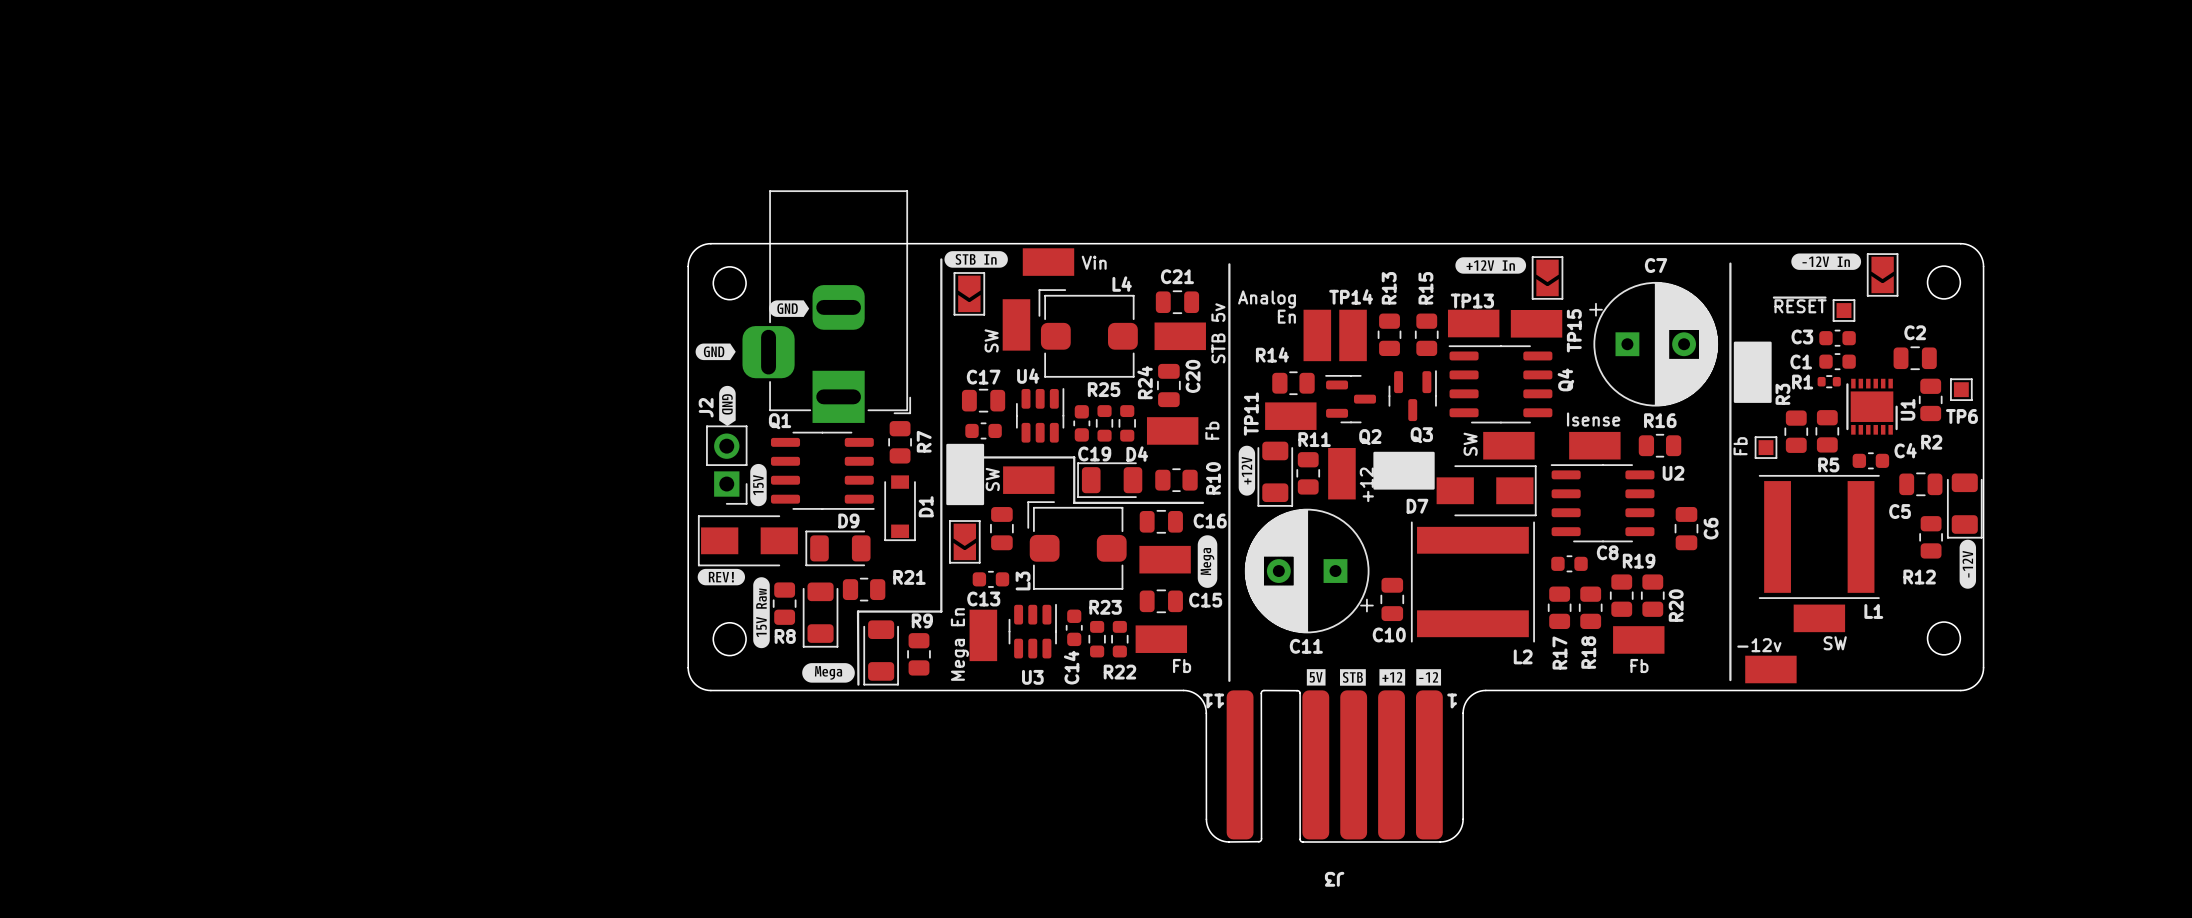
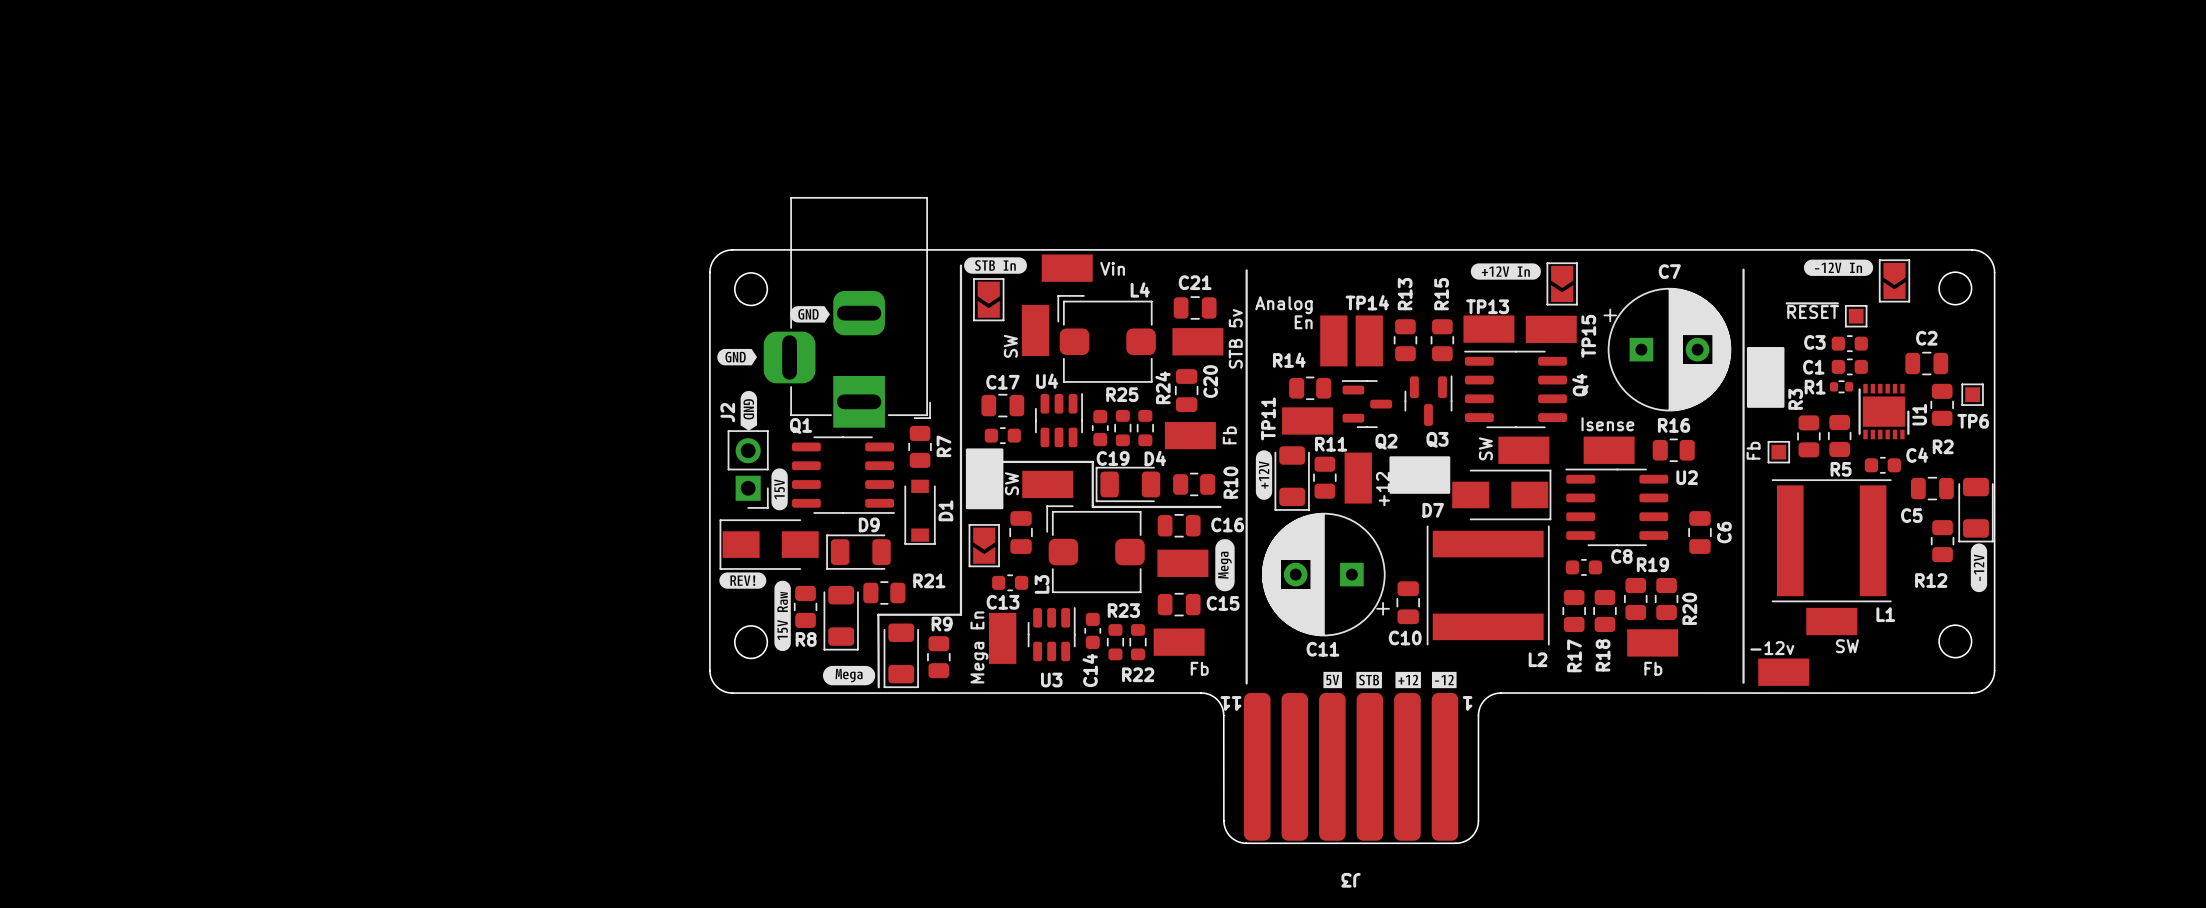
J3 footprint: [1226, 690, 1443, 840] -> [1243, 692, 1459, 841]
board edge: (1229, 841) (1259, 841) (1261, 839) (1261, 693) (1263, 690) (1297, 690) (1299, 692) (1301, 841) (1440, 841) -> (1246, 843) (1455, 843)

